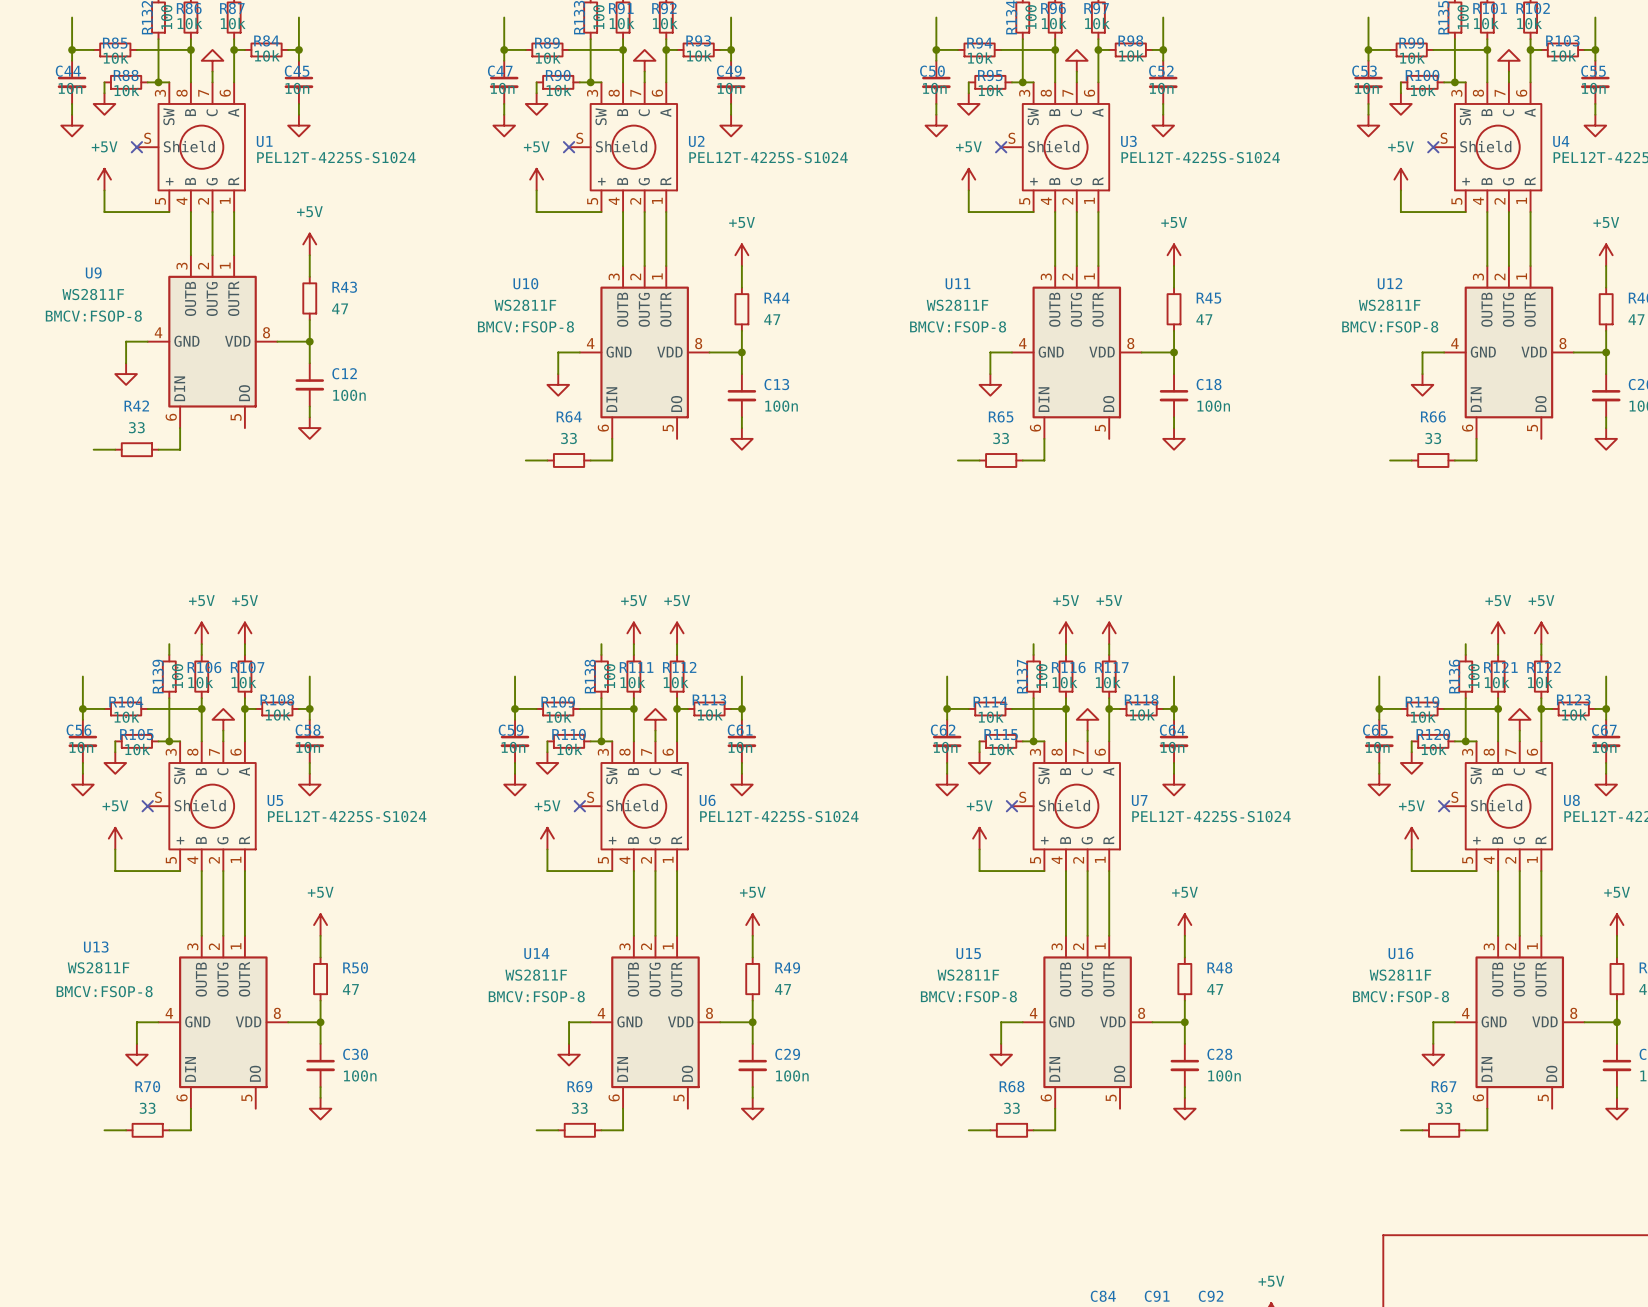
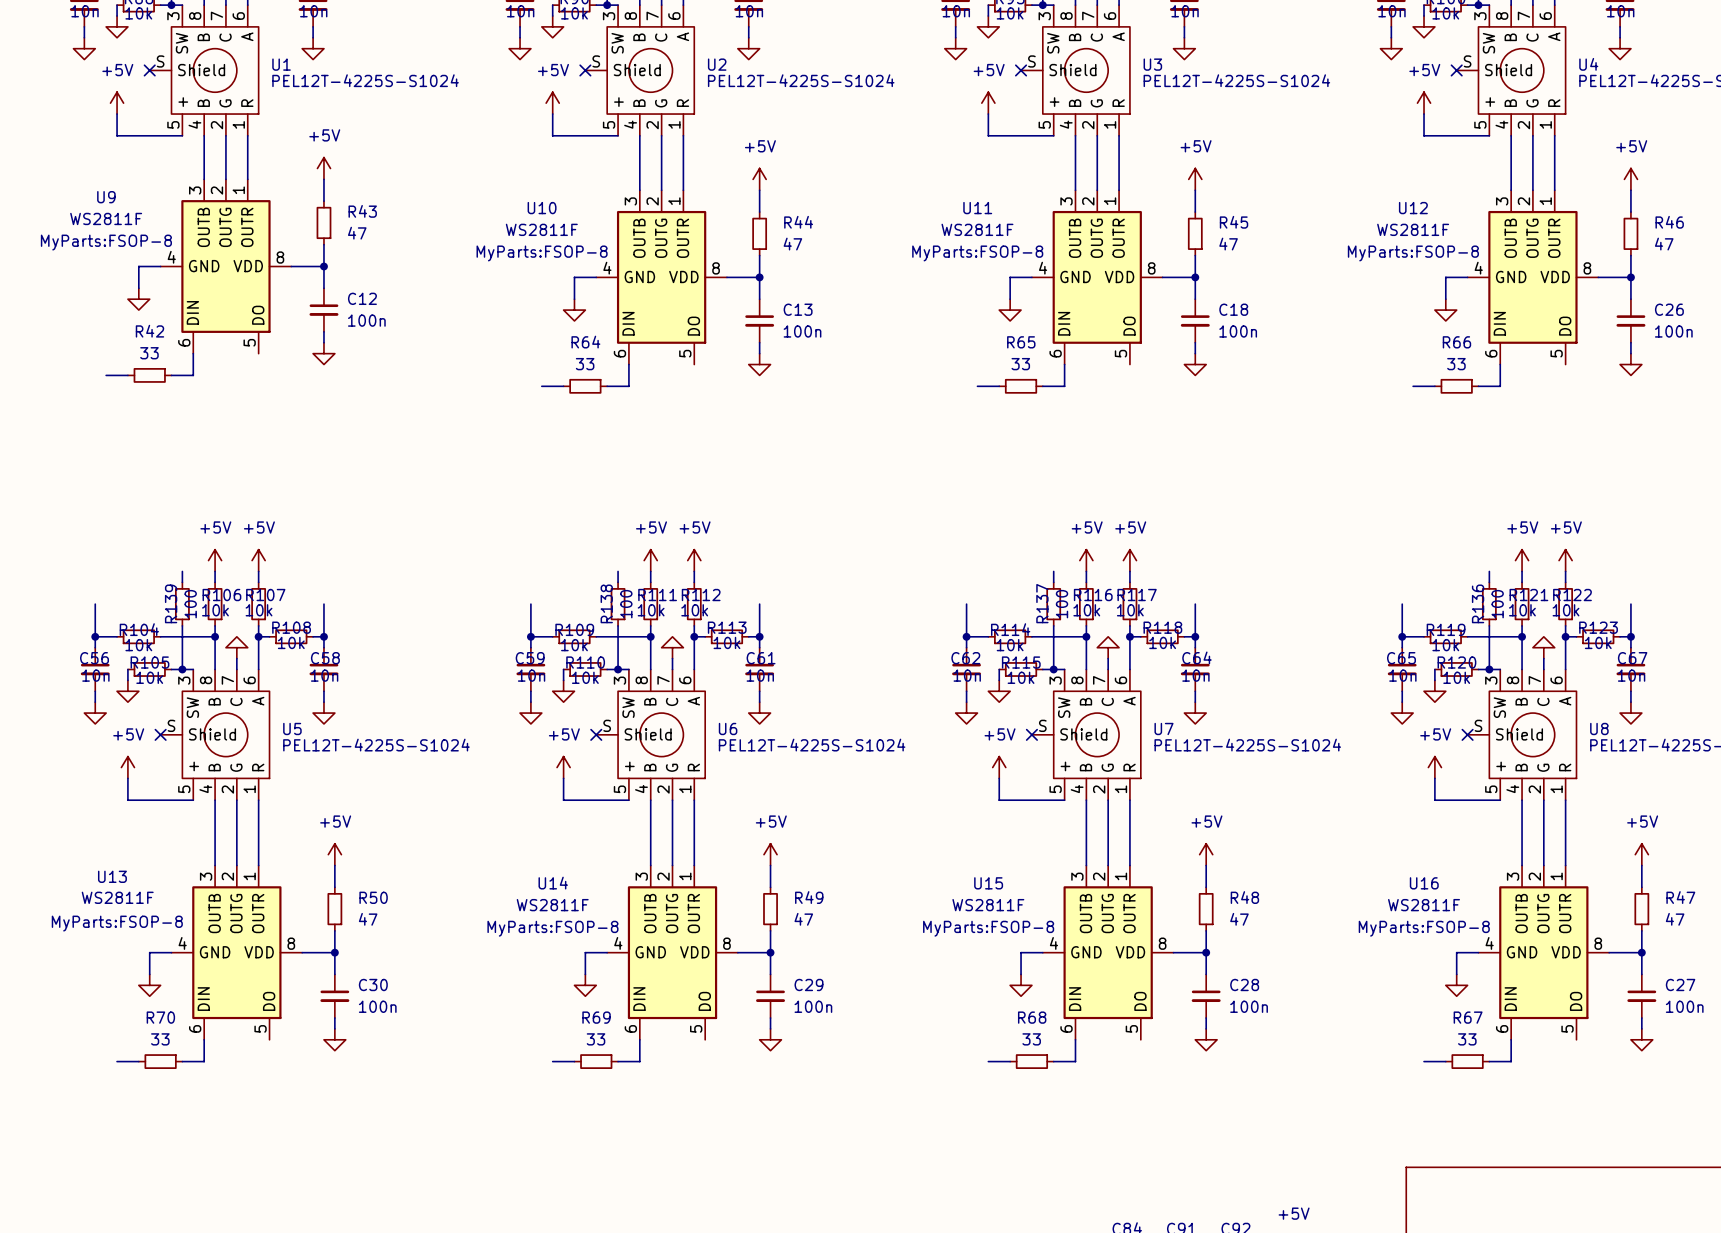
U9 text: BMCV:FSOP-8 (93, 316) -> MyParts:FSOP-8 (106, 242)
U10 text: BMCV:FSOP-8 (525, 326) -> MyParts:FSOP-8 (542, 253)
U11 text: BMCV:FSOP-8 (958, 326) -> MyParts:FSOP-8 (977, 253)
U12 text: BMCV:FSOP-8 (1390, 326) -> MyParts:FSOP-8 (1413, 253)
U13 text: BMCV:FSOP-8 (104, 991) -> MyParts:FSOP-8 (117, 923)
U14 text: BMCV:FSOP-8 (536, 996) -> MyParts:FSOP-8 (552, 928)
U15 text: BMCV:FSOP-8 (968, 996) -> MyParts:FSOP-8 (988, 928)
U16 text: BMCV:FSOP-8 (1401, 996) -> MyParts:FSOP-8 (1424, 928)

